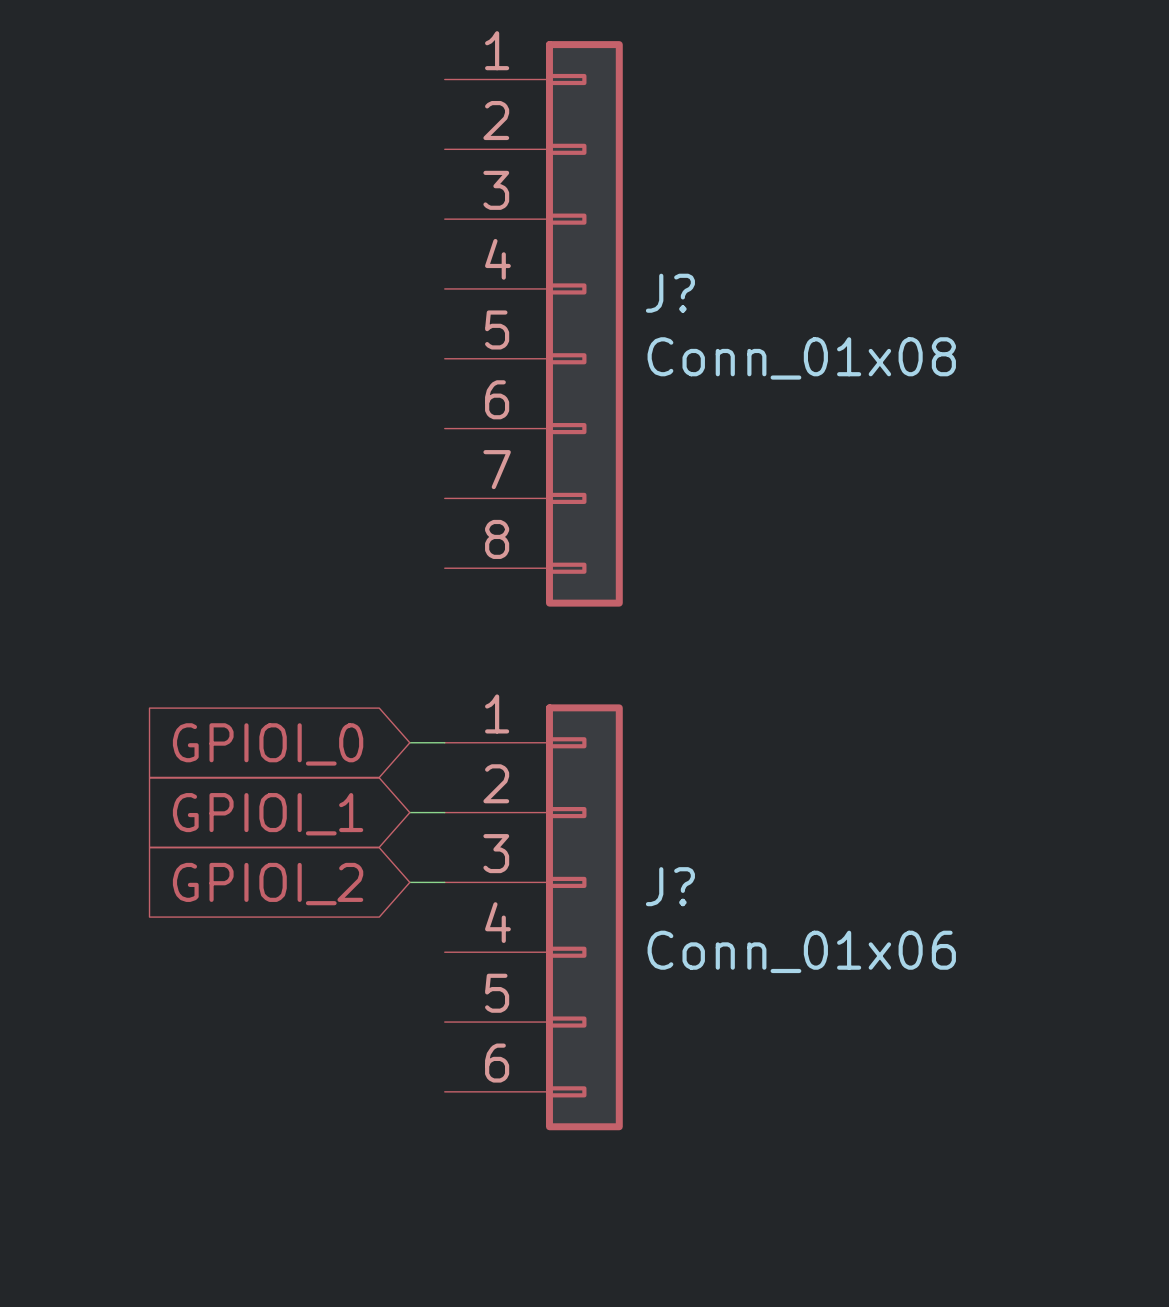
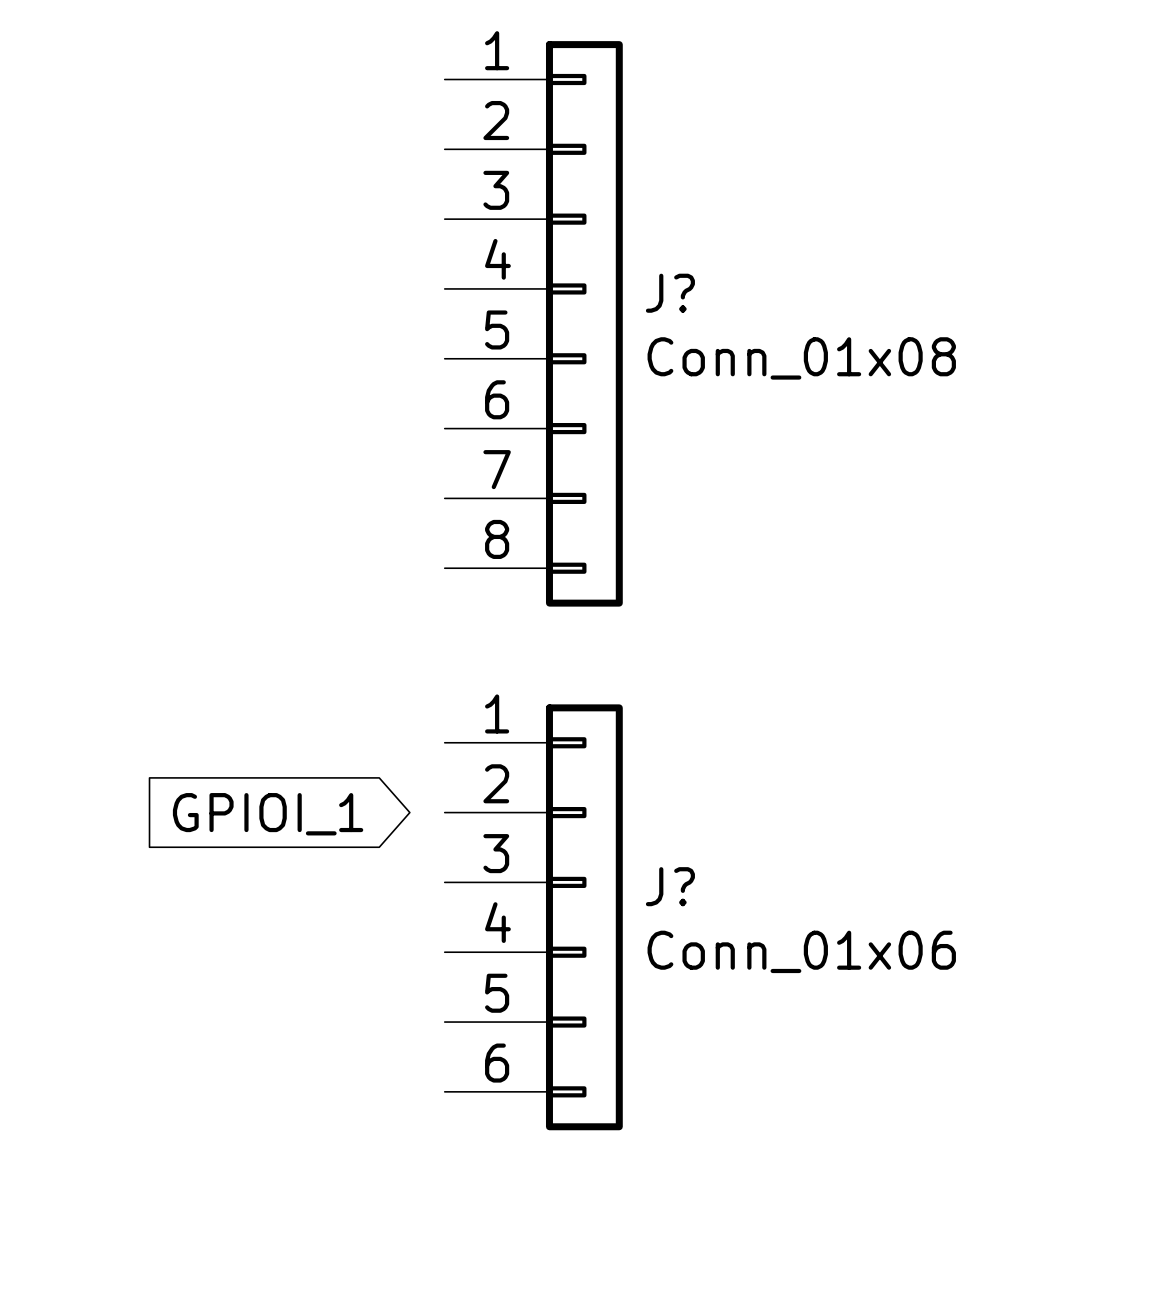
wire: (409, 742) (444, 742) -> none
global label: GPIOI_0 (268, 744) -> none
wire: (409, 812) (444, 812) -> none
wire: (409, 882) (444, 882) -> none
global label: GPIOI_2 (268, 884) -> none

